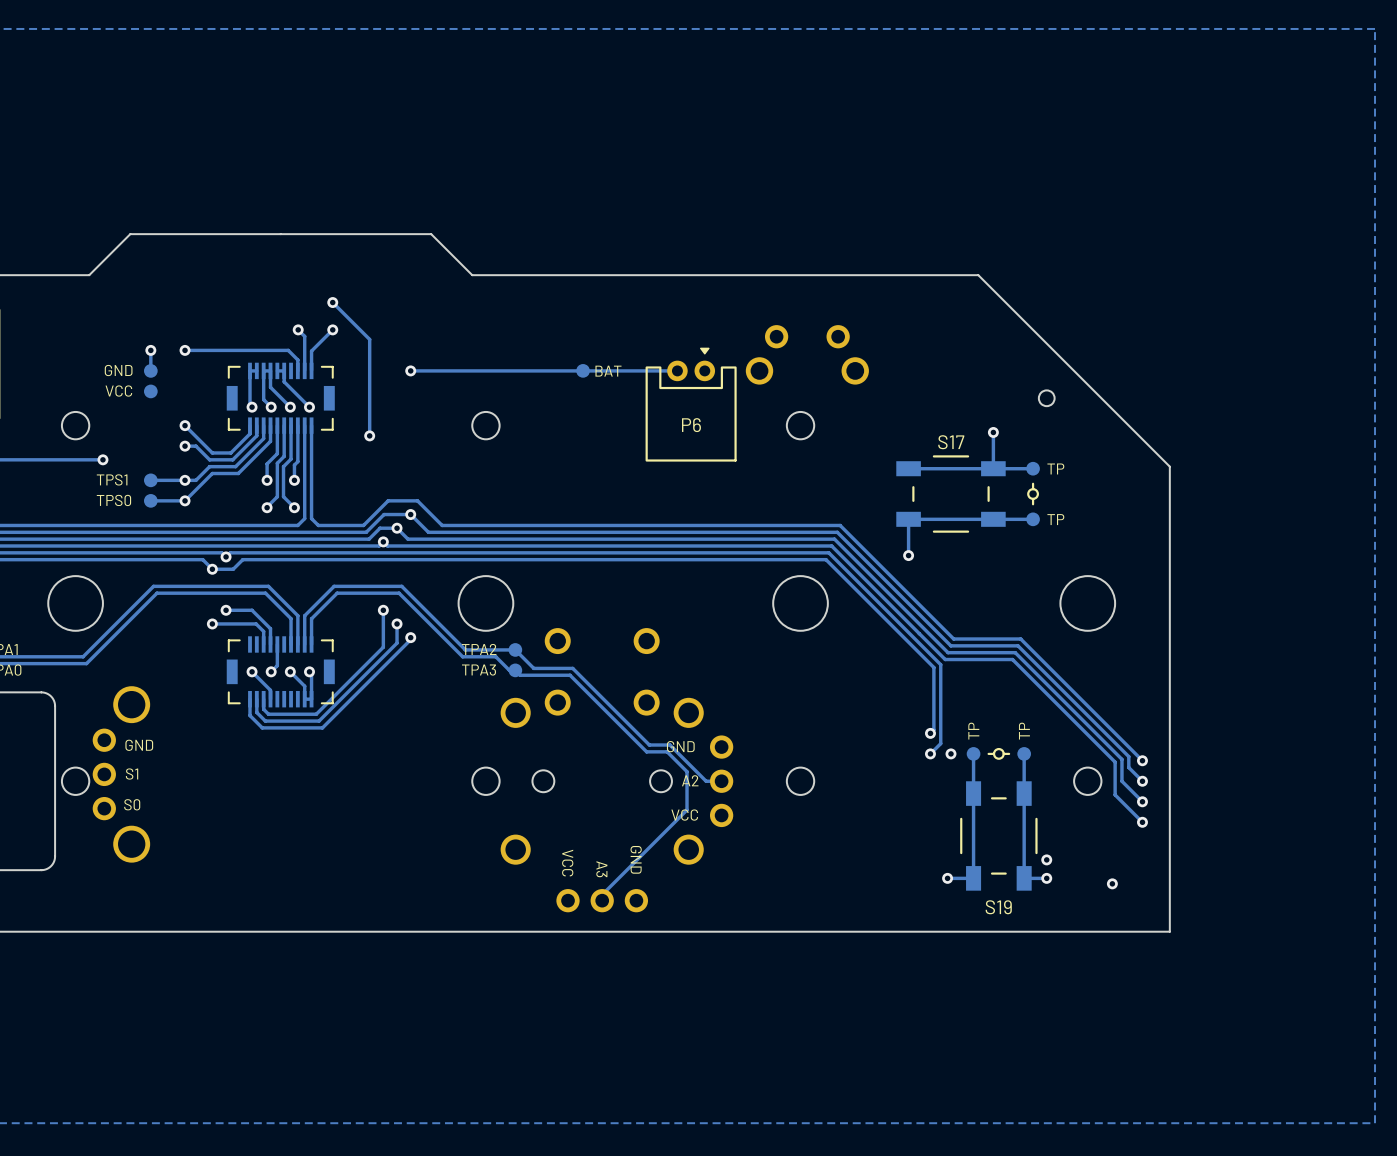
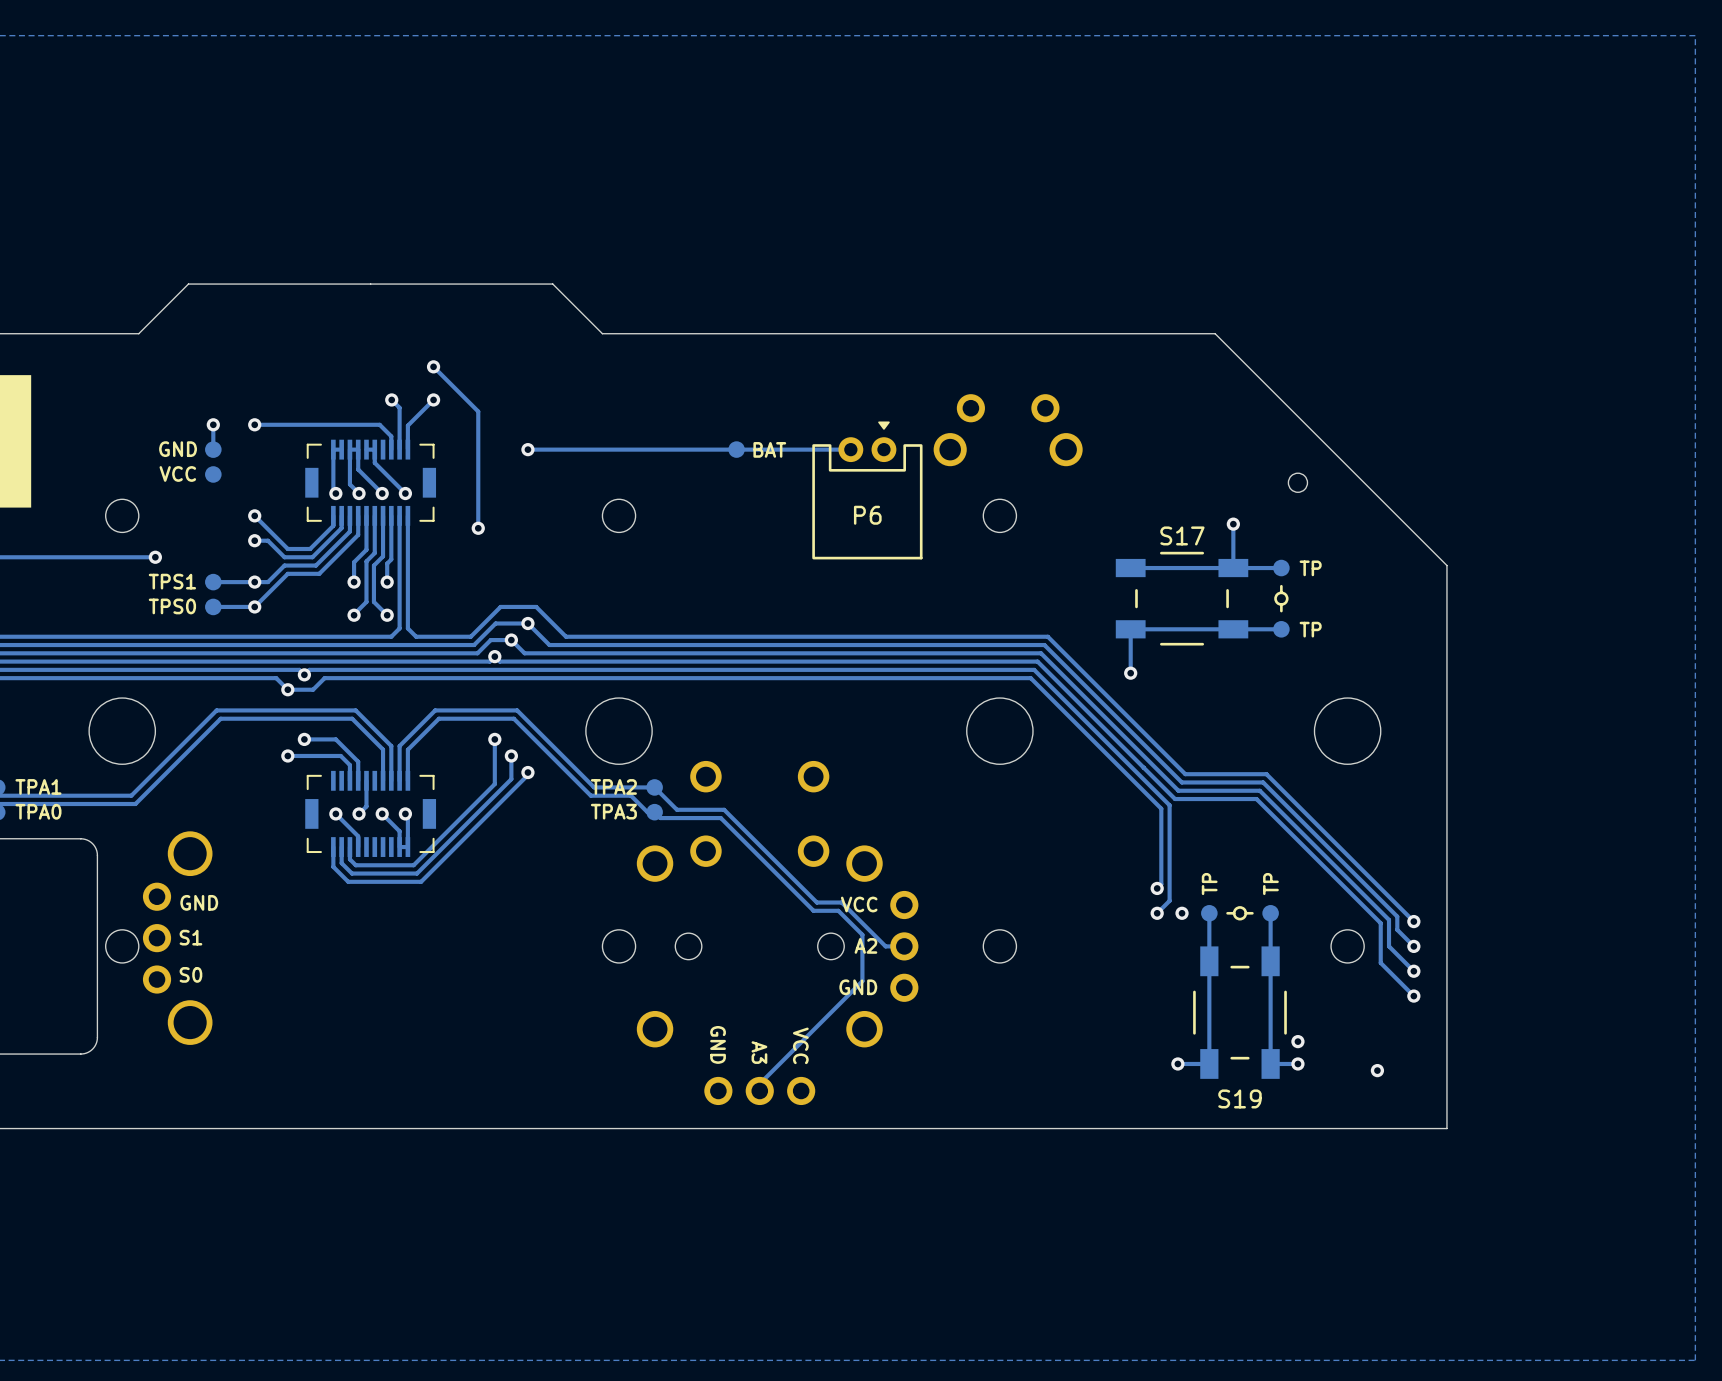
text: GND (680, 746) -> VCC (859, 904)
text: VCC (684, 815) -> GND (858, 987)
text: GND (636, 859) -> VCC (800, 1045)
text: VCC (567, 863) -> GND (718, 1044)

